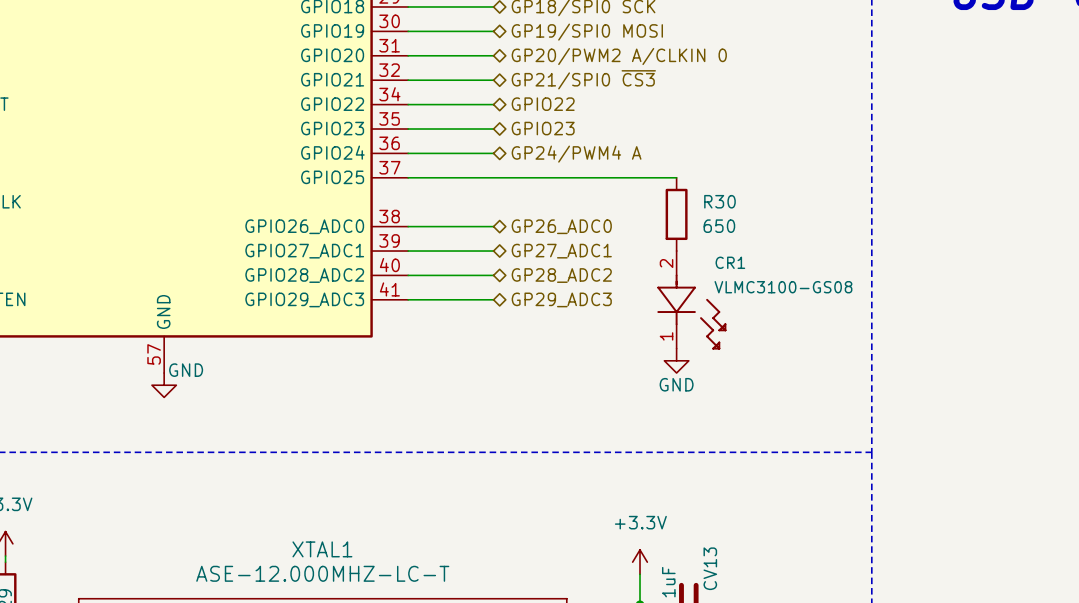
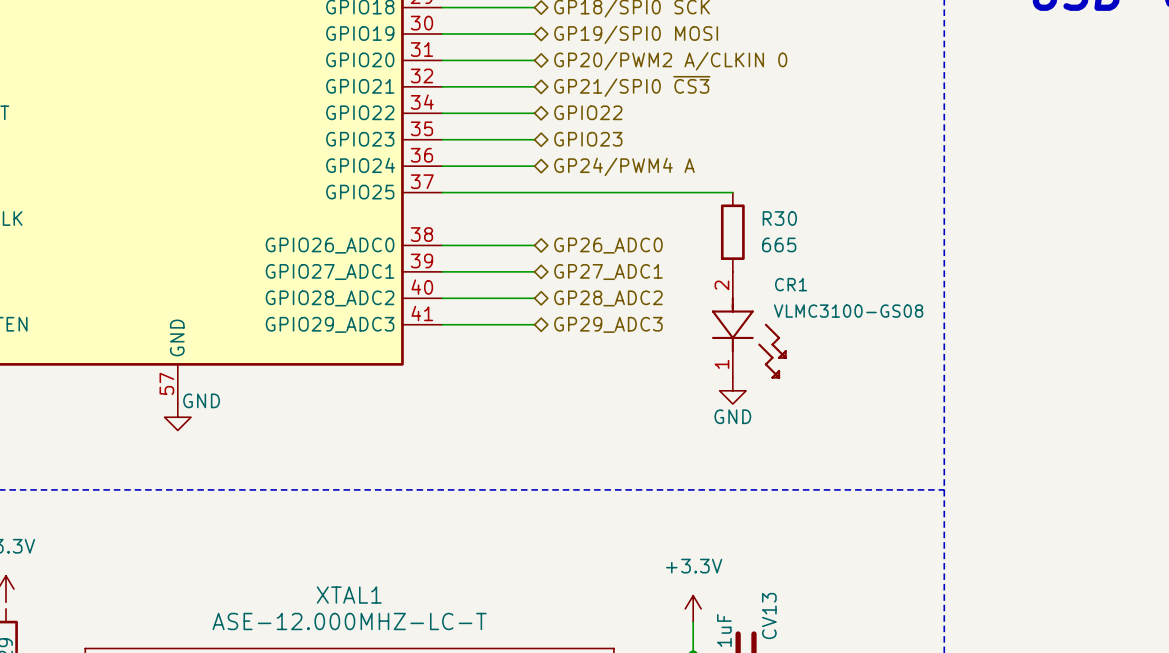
R30 value: 650 (719, 226) -> 665 (779, 244)
wire: (5, 556) (5, 562) -> none

